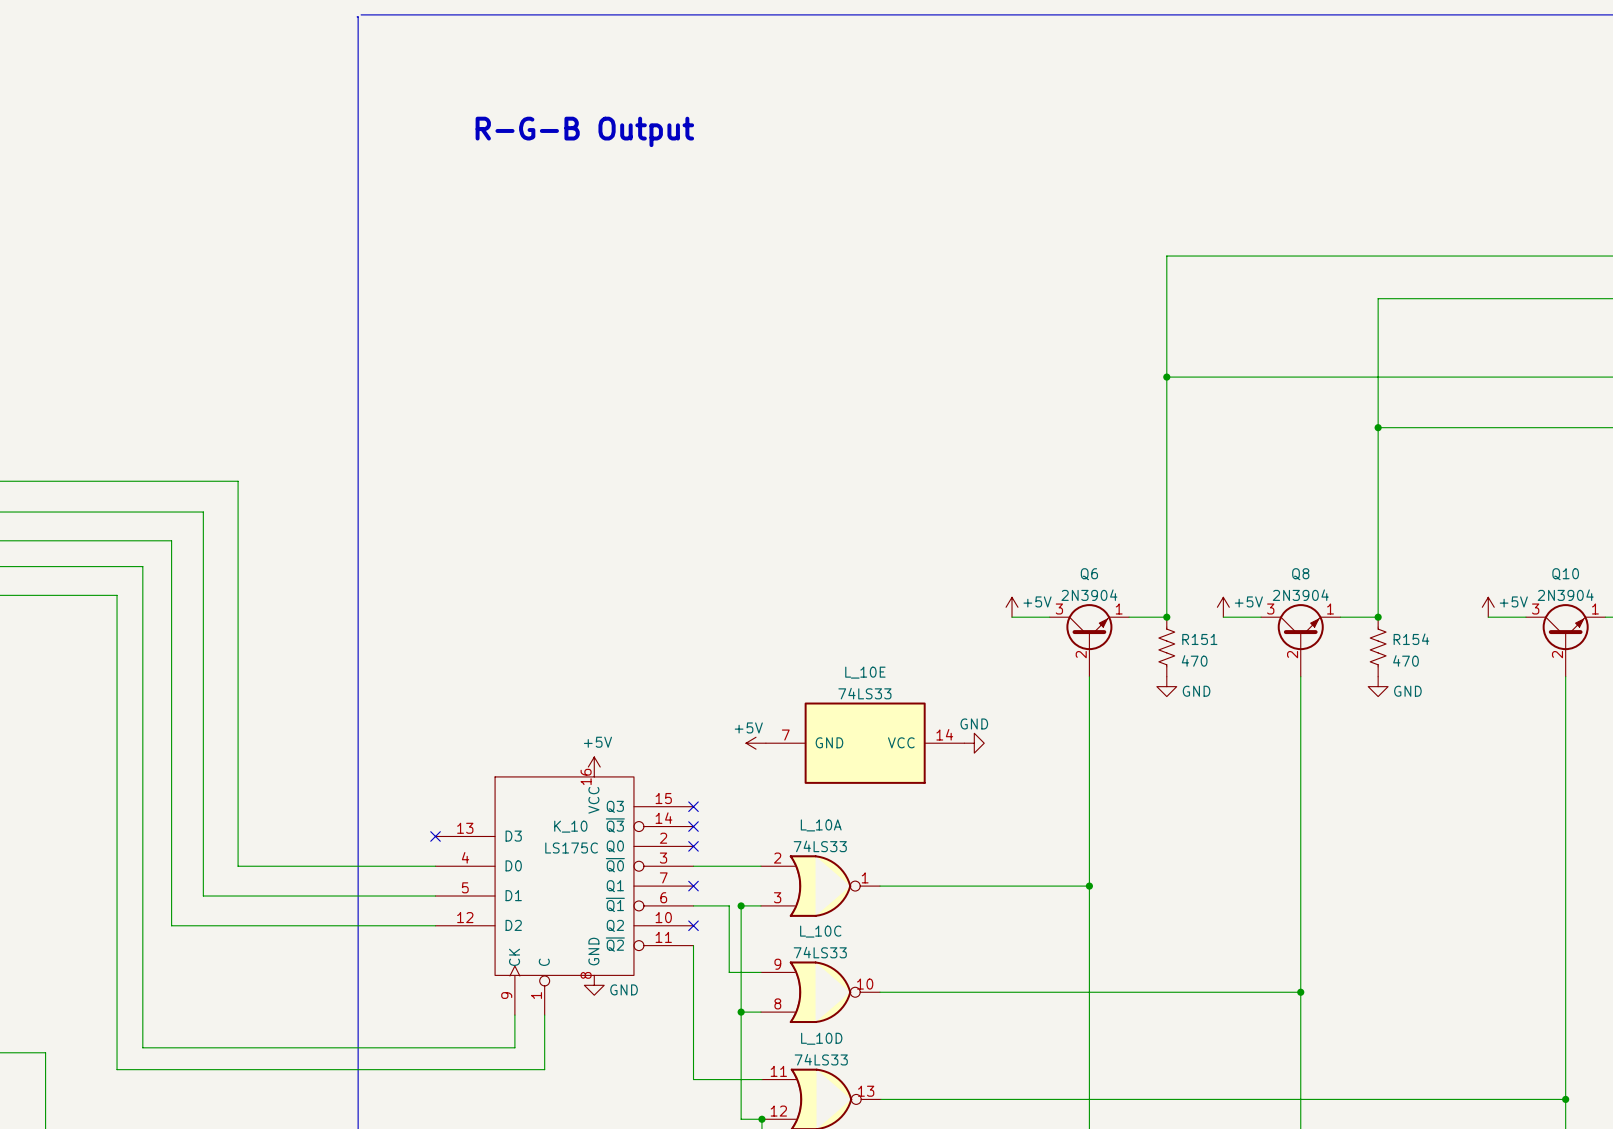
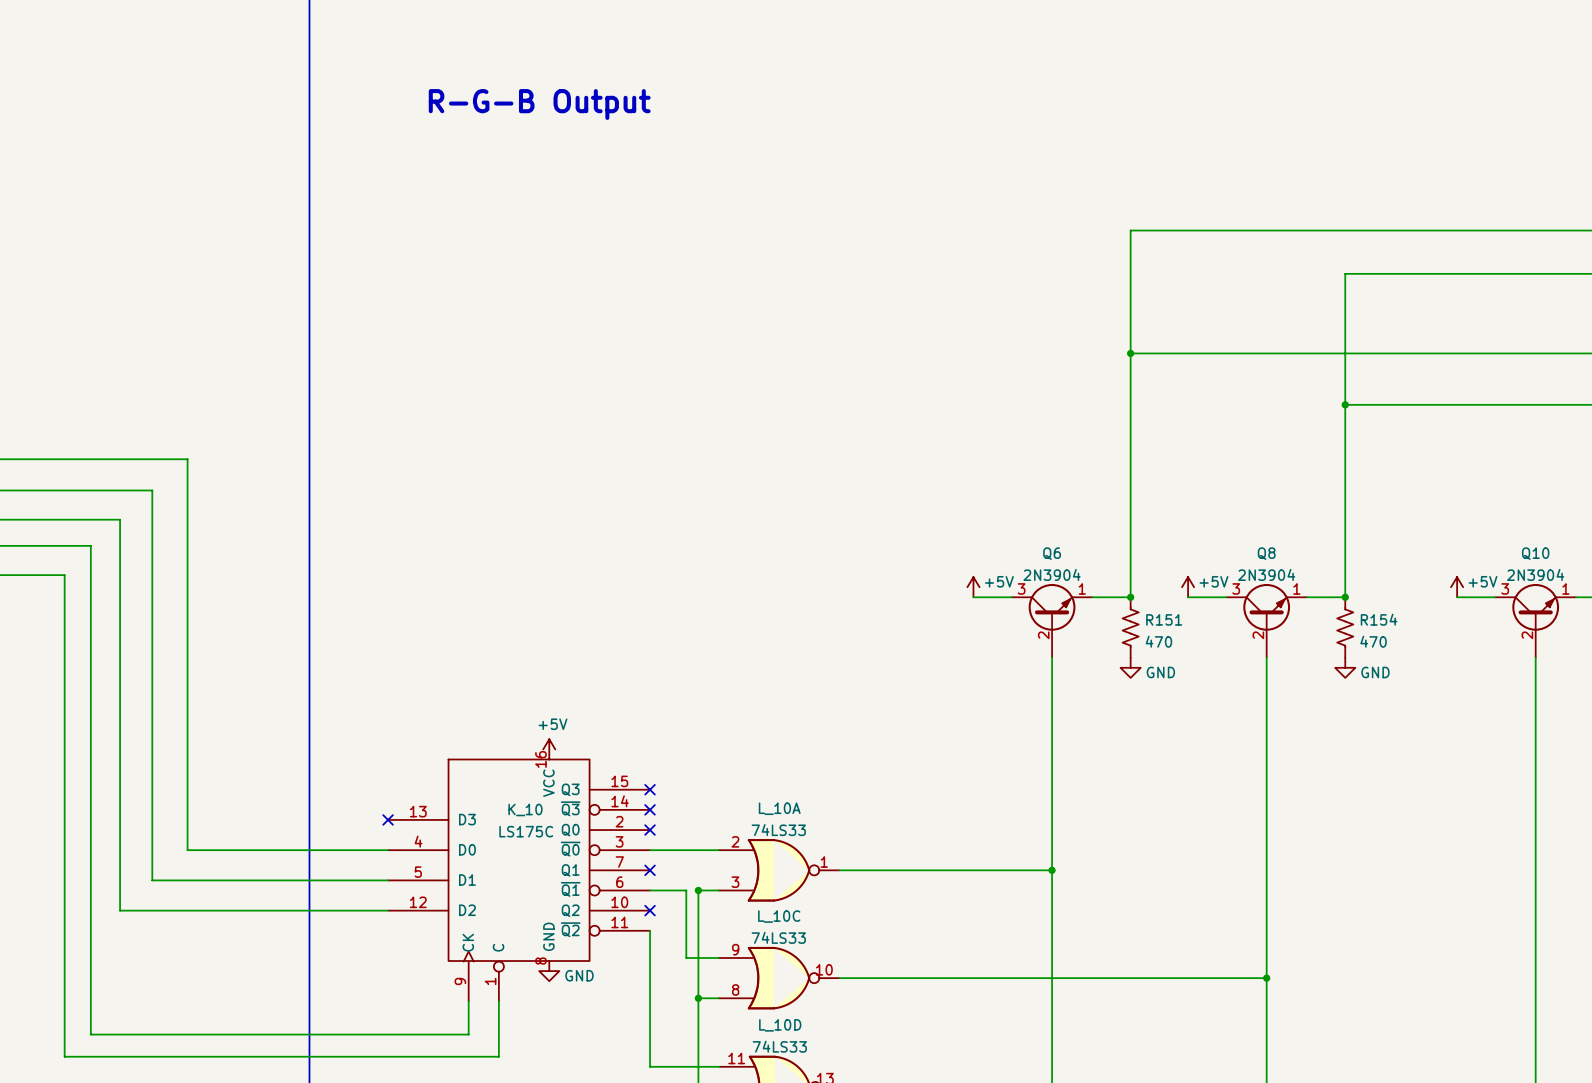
power symbol: +5V (756, 743) -> none
L_10E: 74LS33 (865, 743) -> none
power symbol: GND (974, 743) -> none

